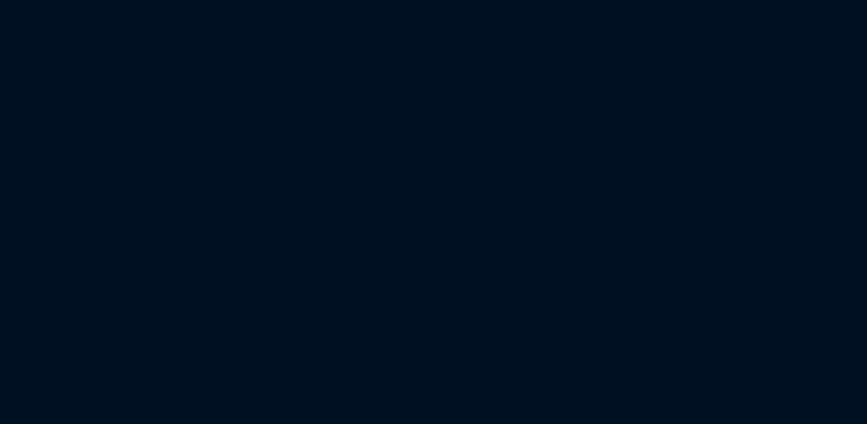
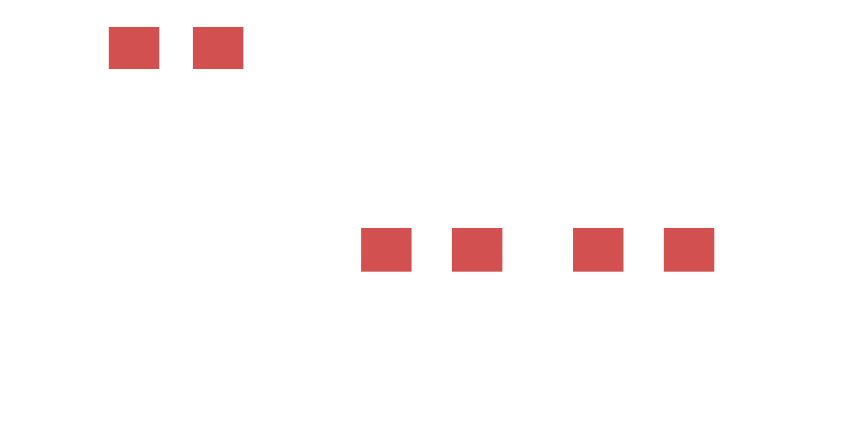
part: none -> (176, 48)
part: none -> (431, 249)
part: none -> (643, 249)

